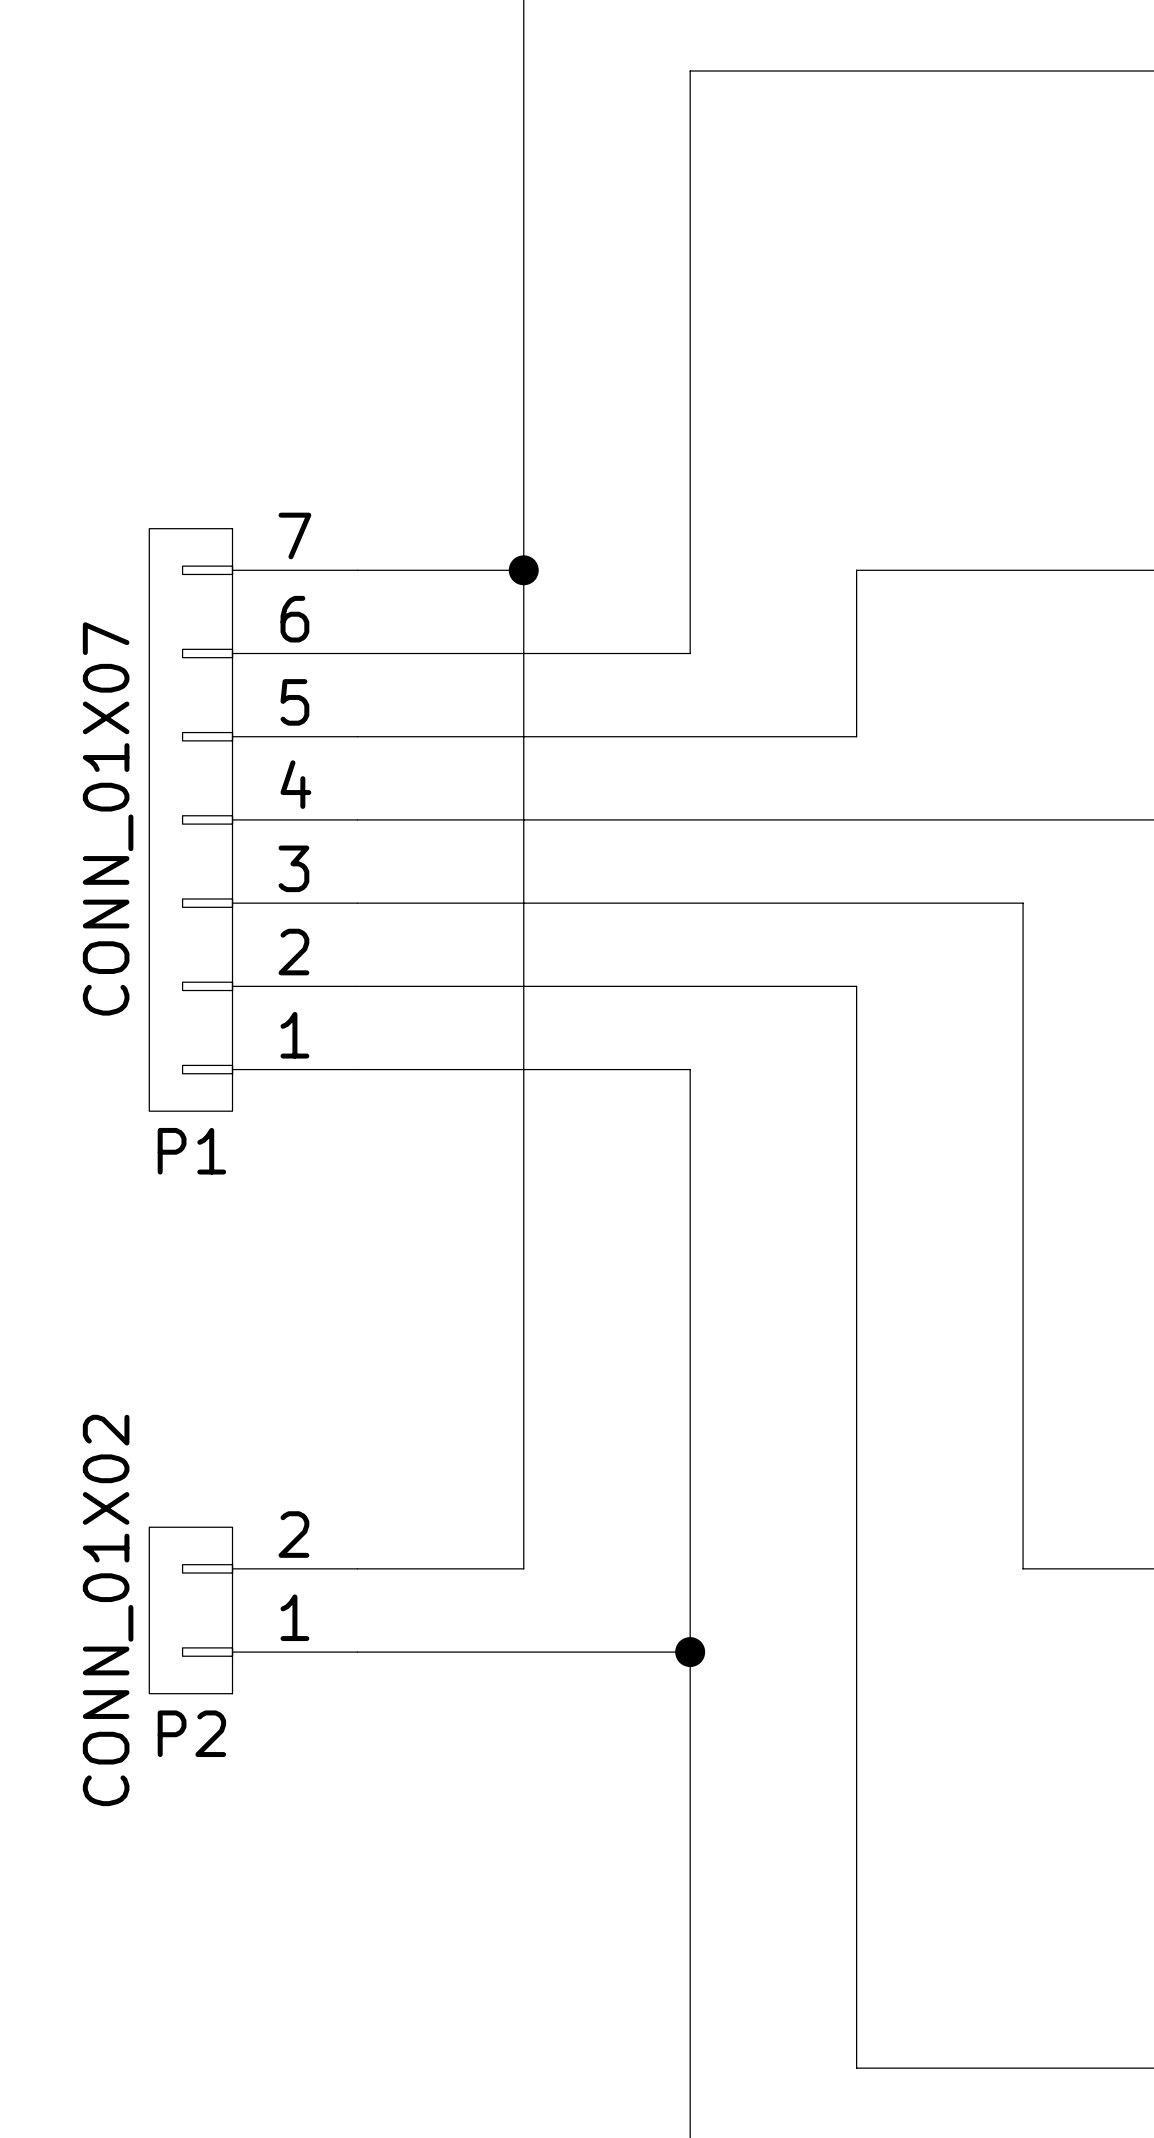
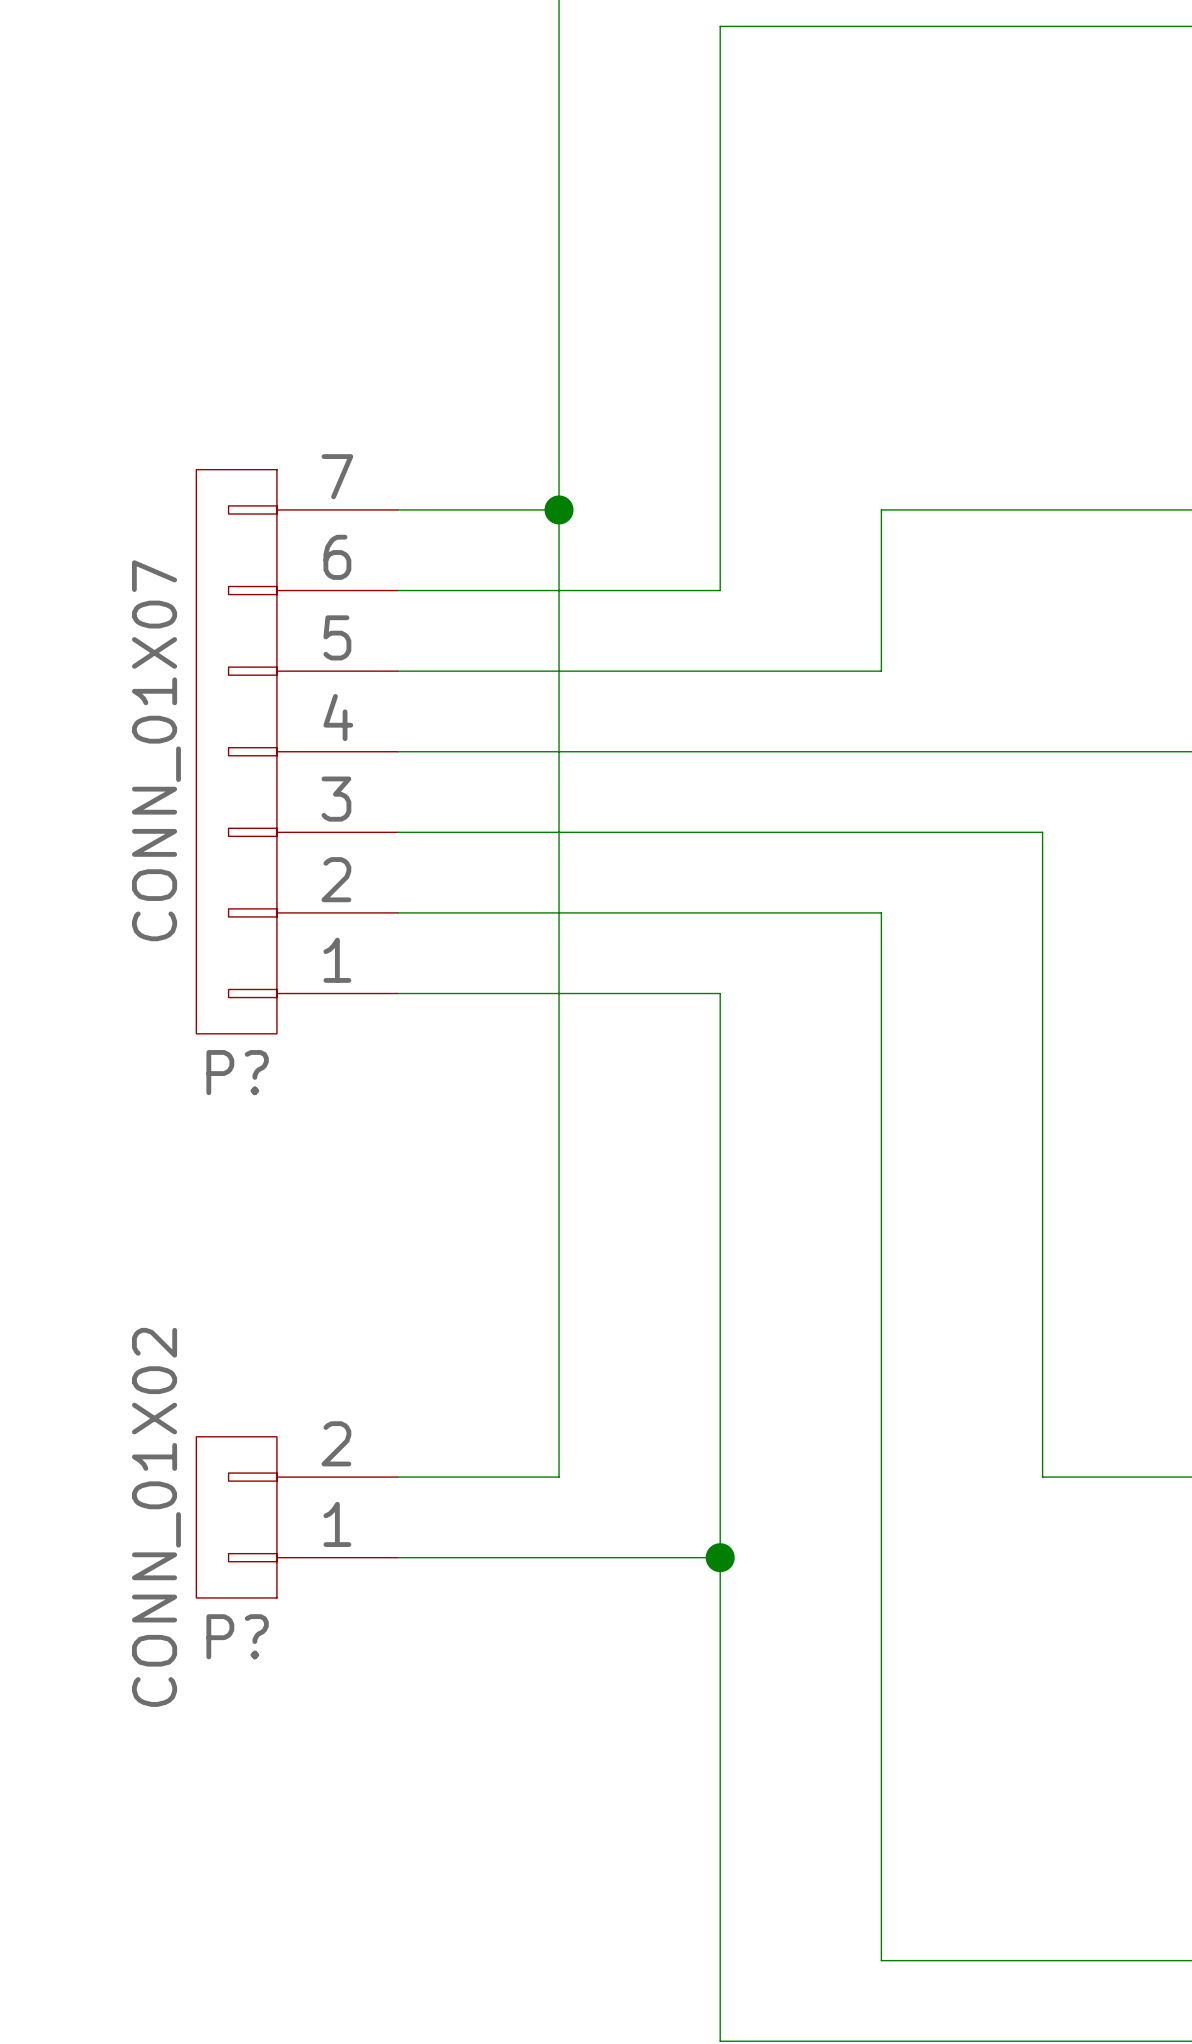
P1 name: P1 (191, 1151) -> P? (237, 1072)
P2 name: P2 (191, 1733) -> P? (237, 1636)

